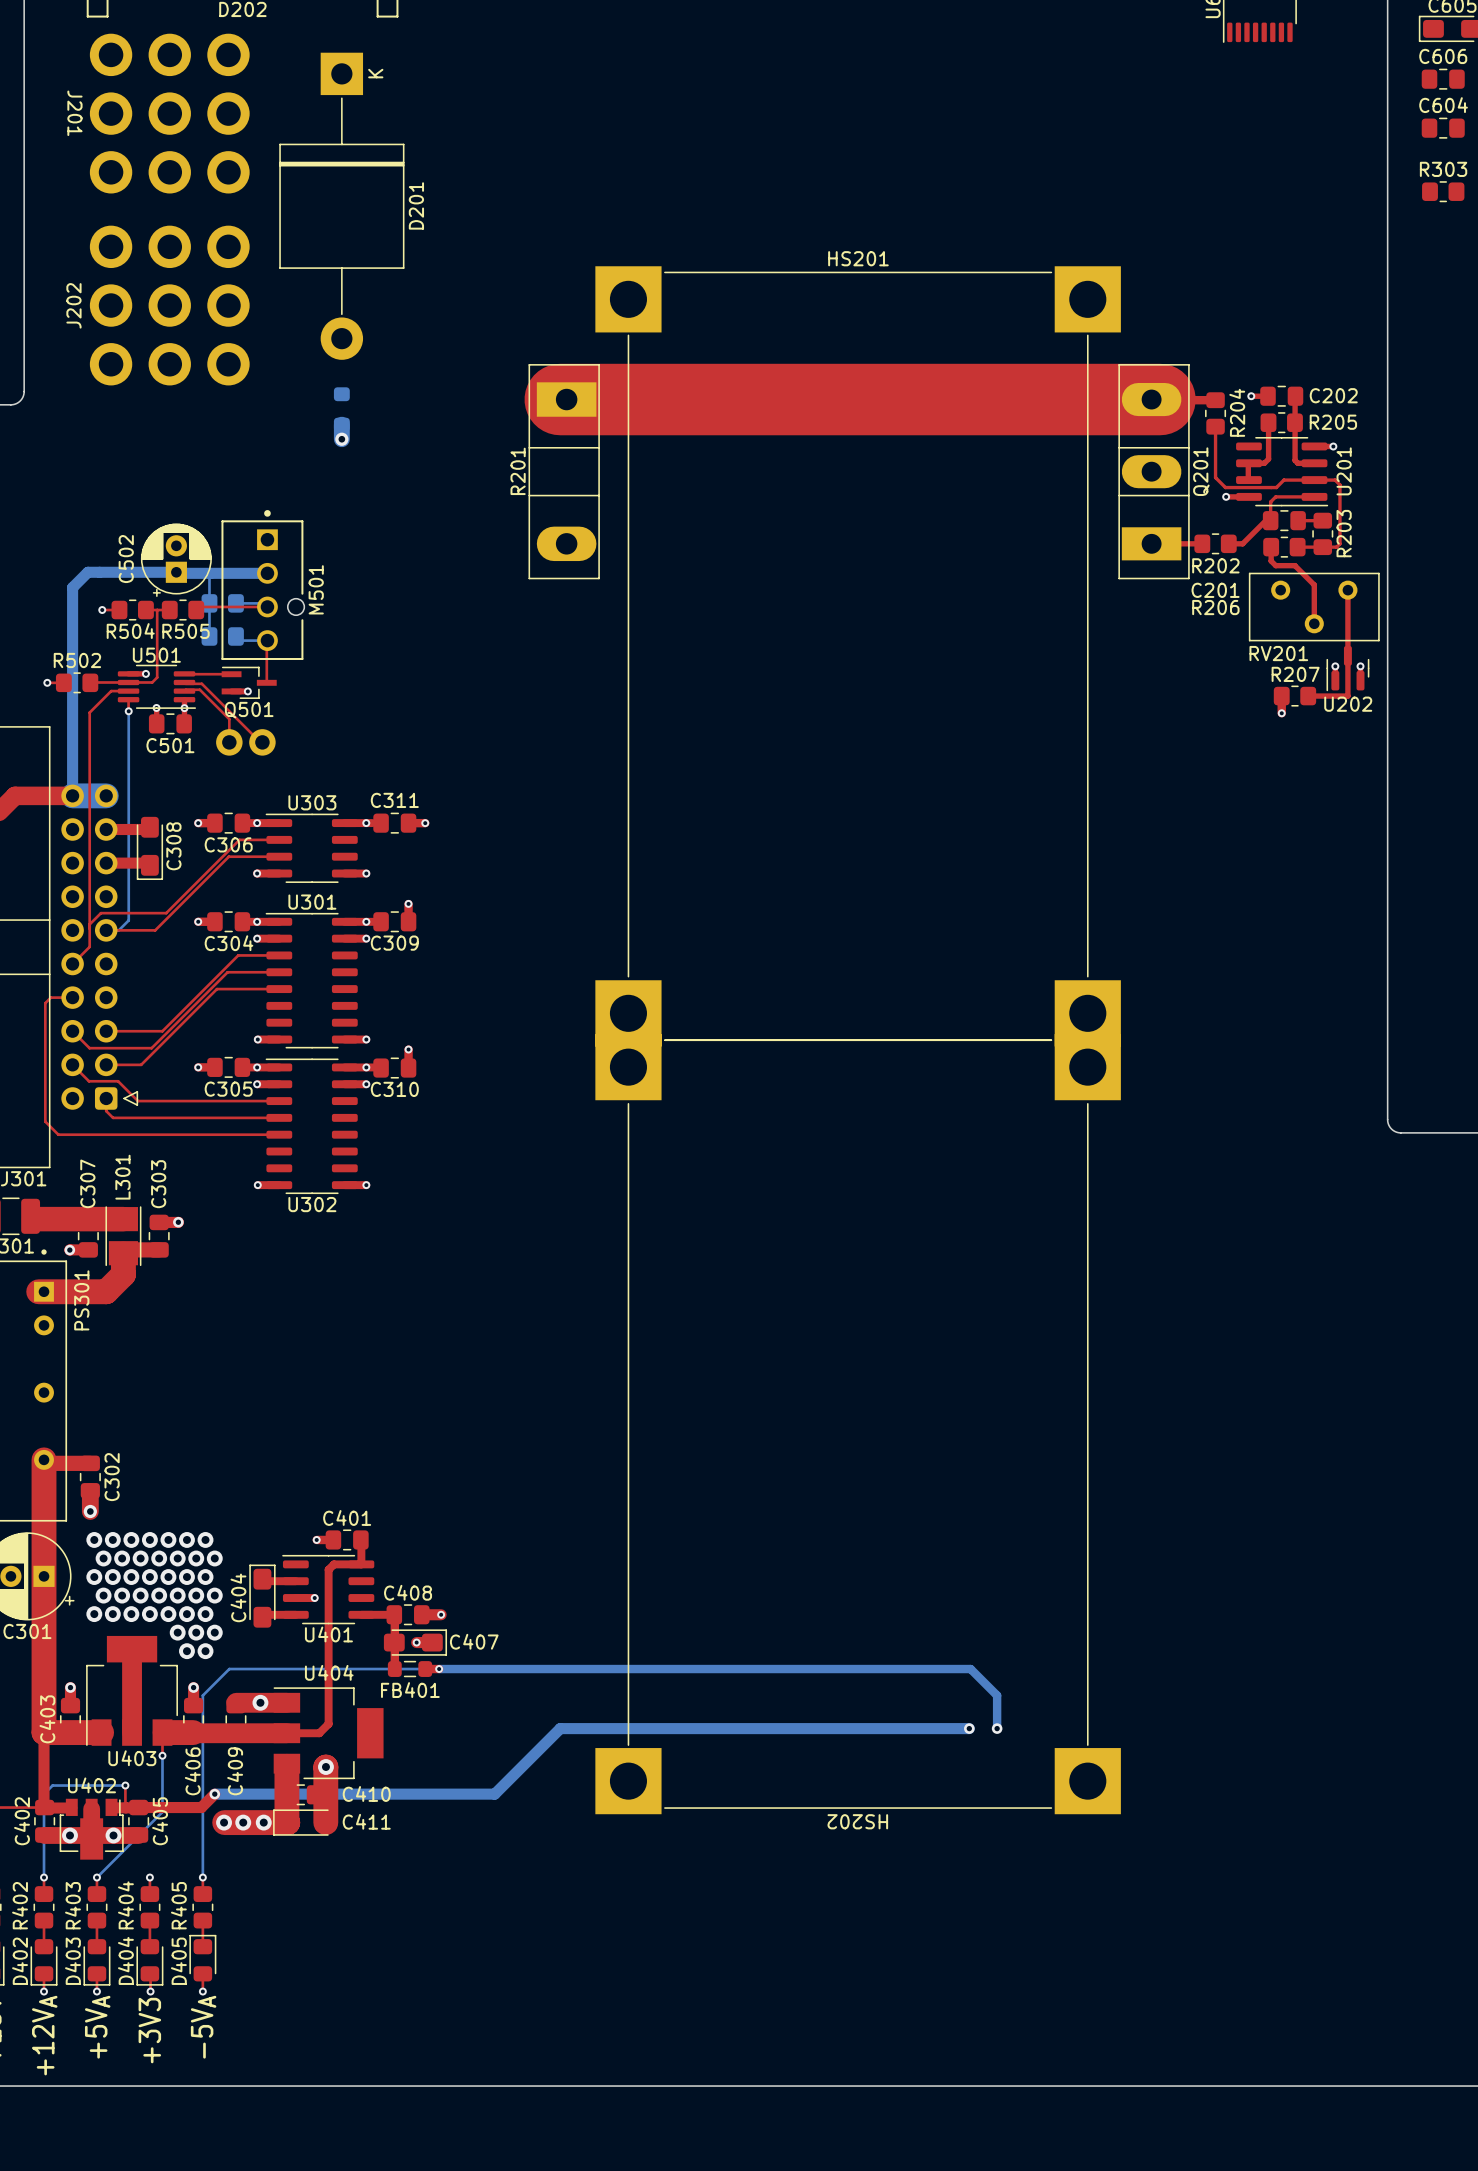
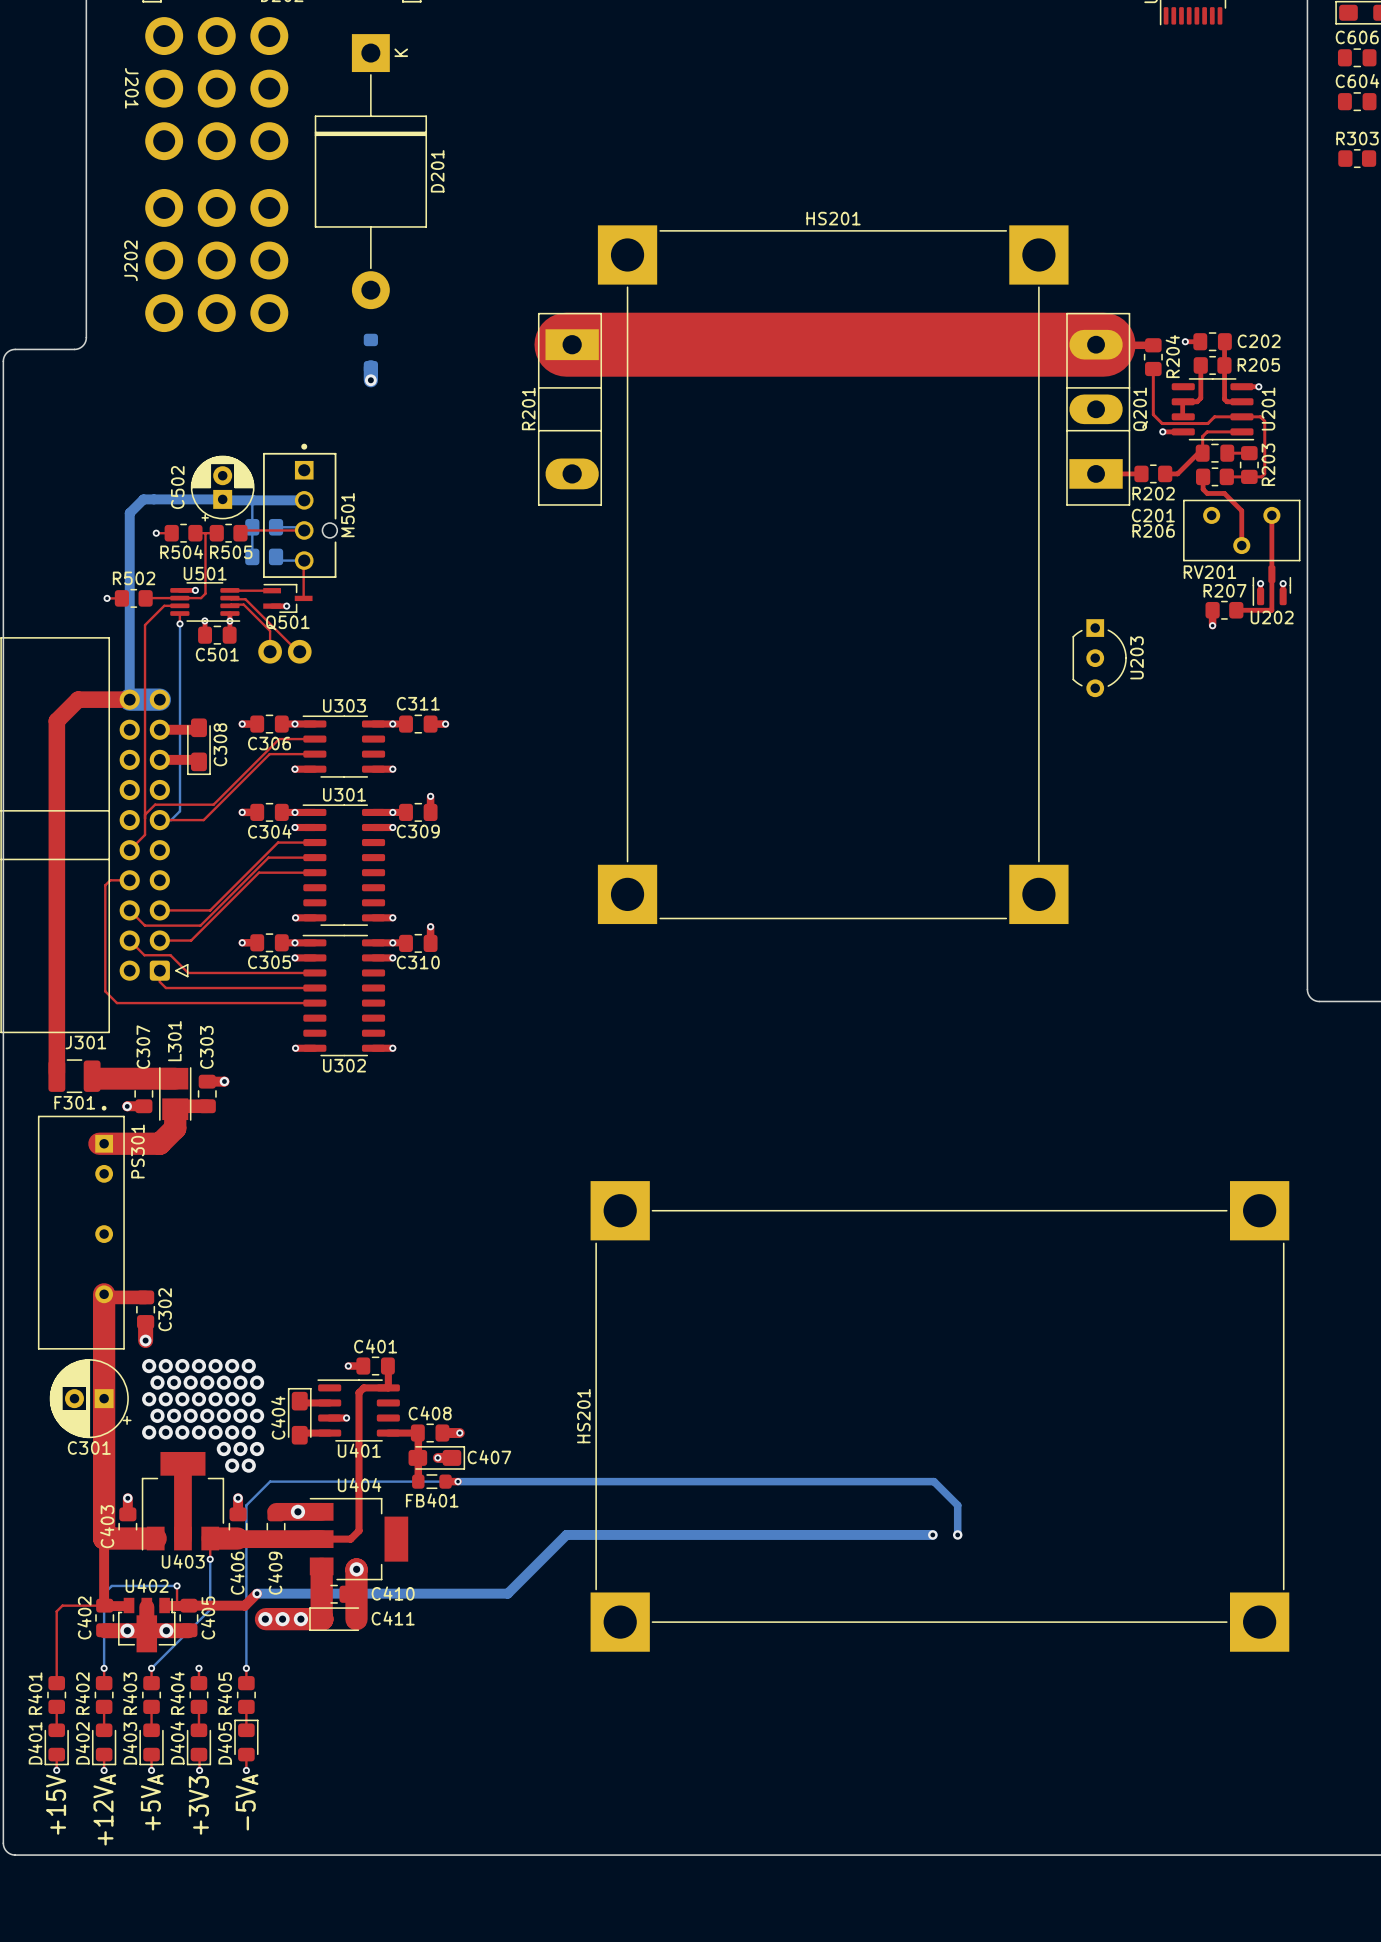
U203: none -> (1099, 658)
HS202: (858, 1424) -> none
HS201: none -> (939, 1416)

